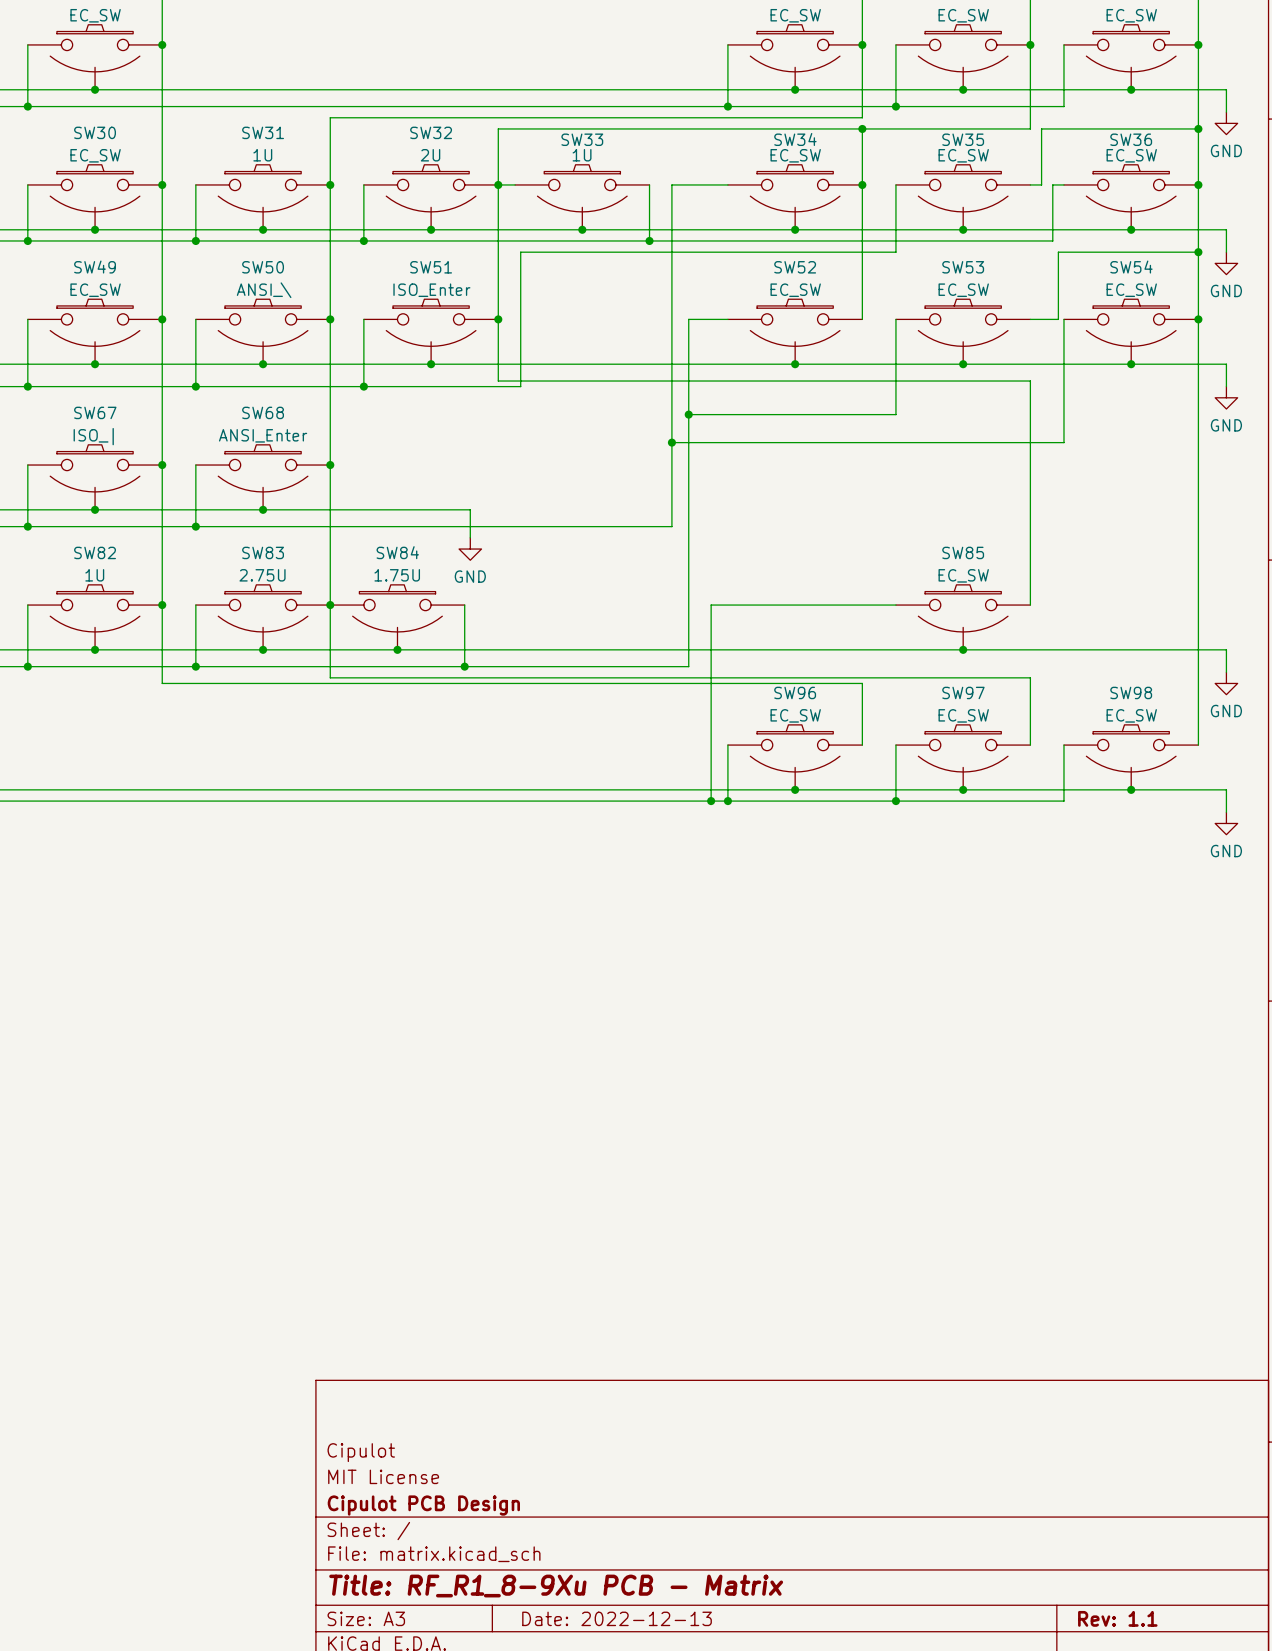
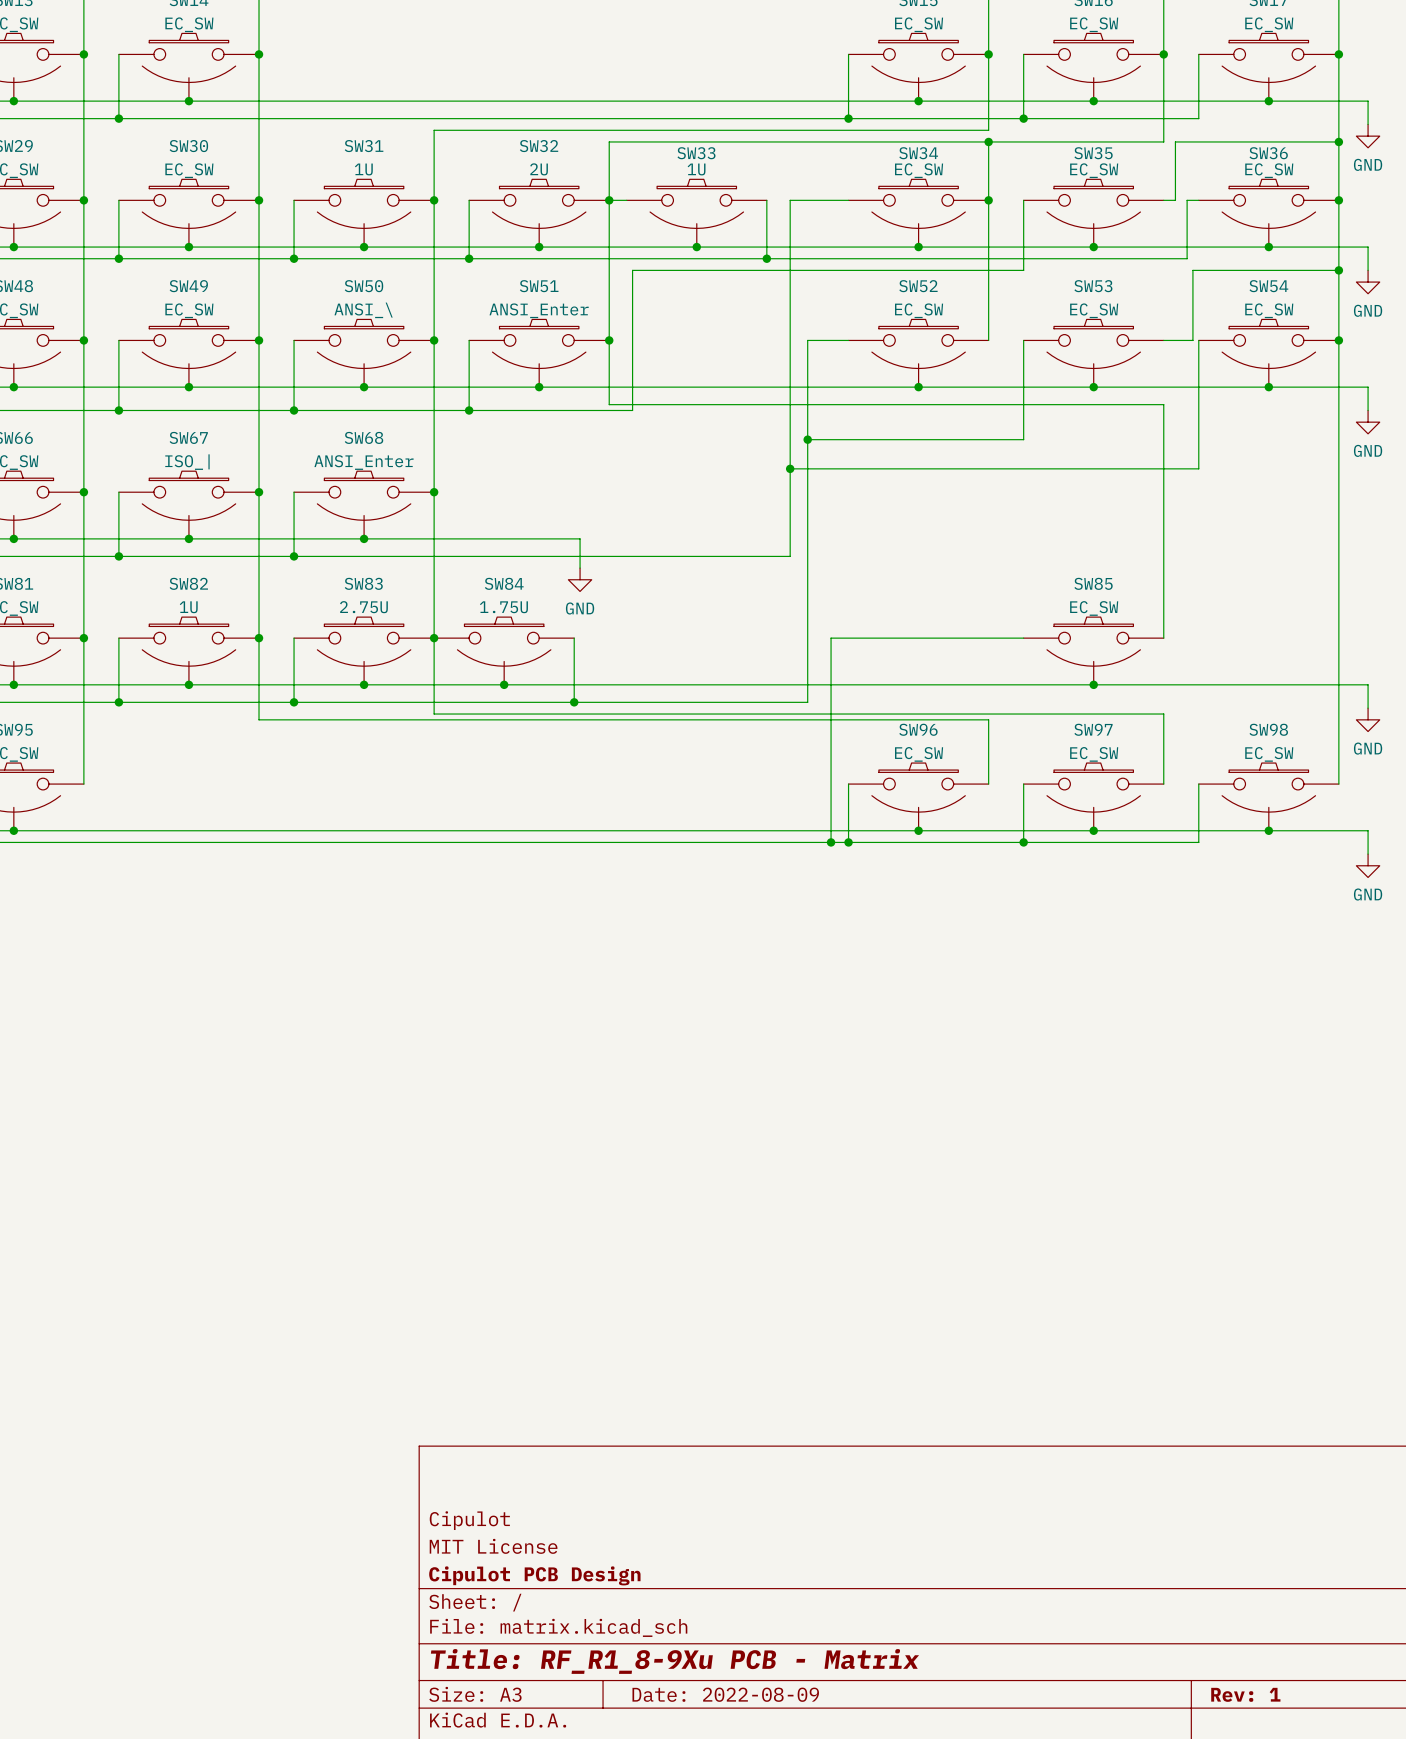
SW51 value: ISO_Enter (431, 290) -> ANSI_Enter (539, 310)
title block: Date: 2022-12-13 (617, 1618) -> Date: 2022-08-09 (725, 1694)
title block: Rev: 1.1 (1117, 1618) -> Rev: 1 (1245, 1694)

